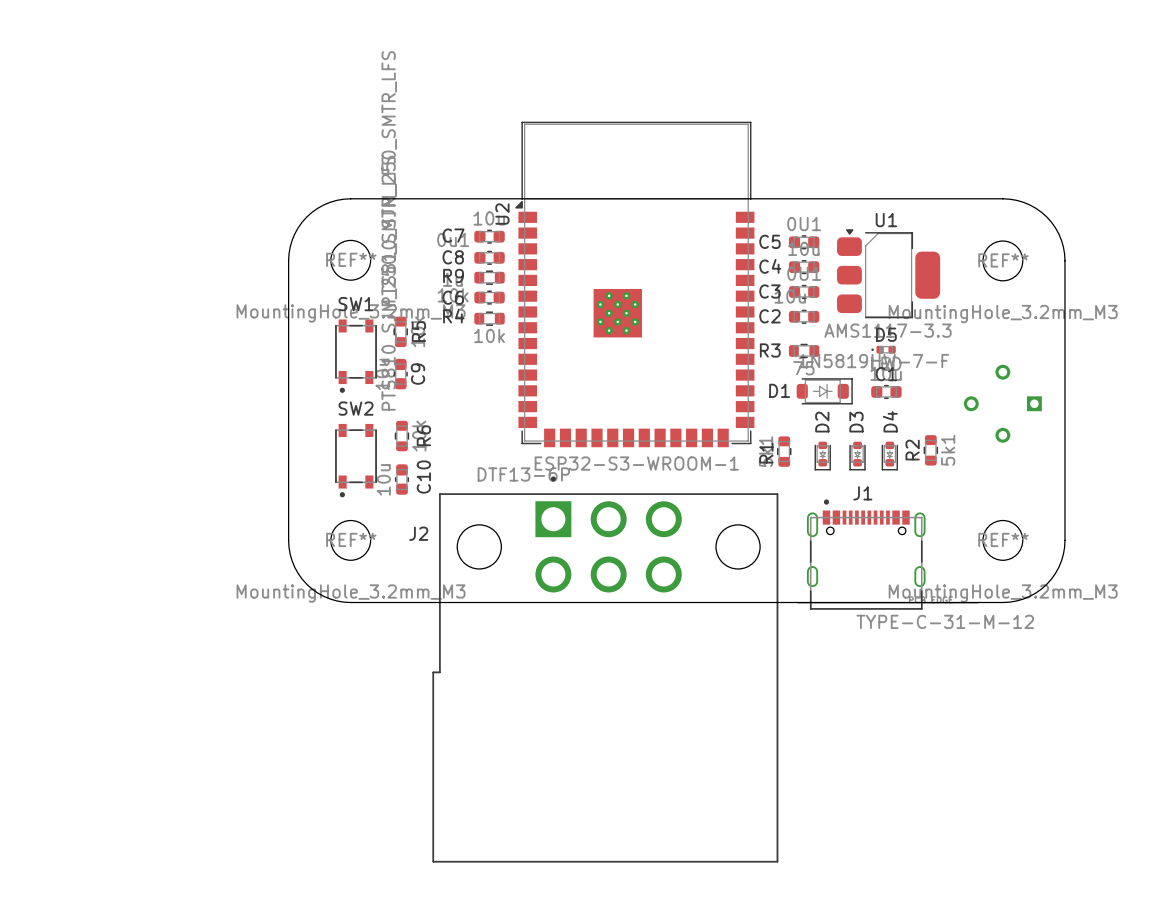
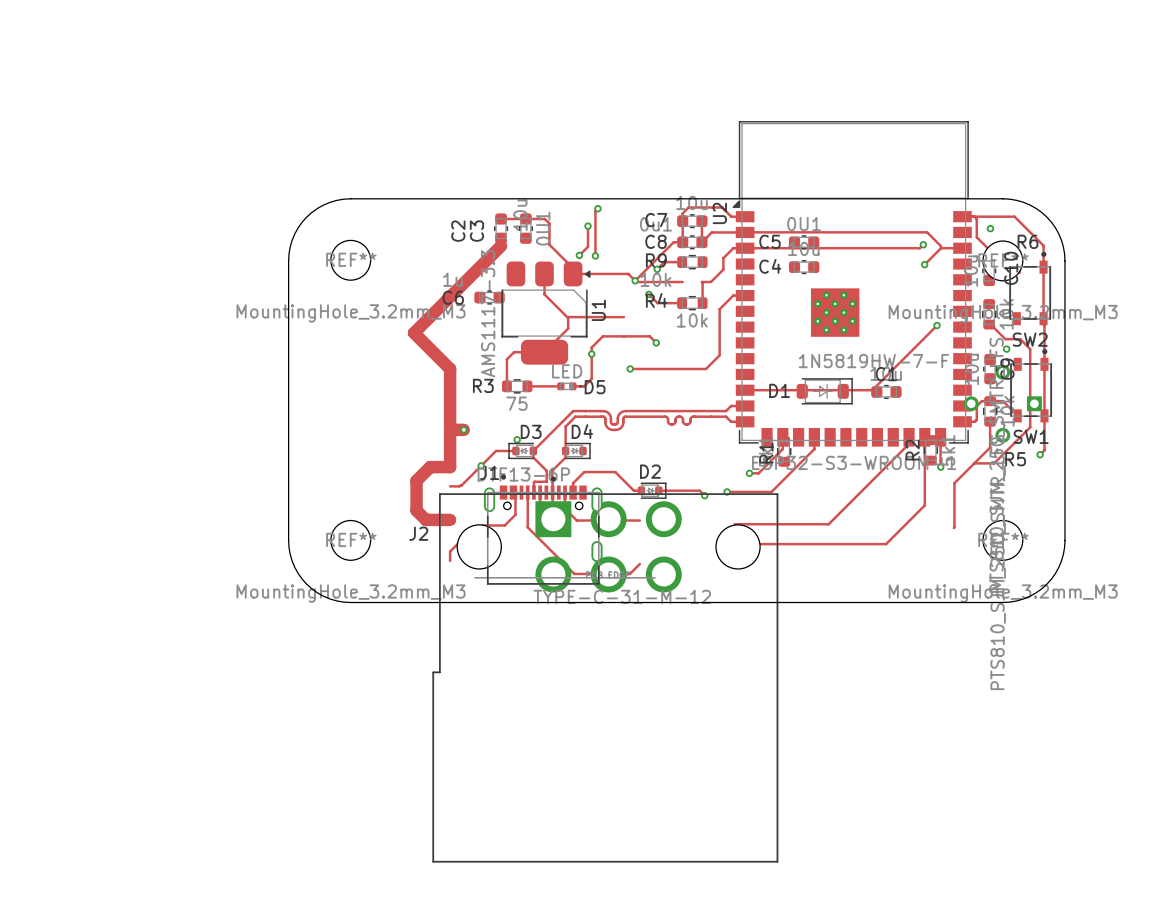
track: none -> (597, 208) (595, 211) (595, 255)
via: none -> (597, 208)
track: none -> (745, 216) (731, 216) (722, 207) (688, 207) (682, 213) (682, 242) (673, 242) (635, 280)
track: none -> (962, 216) (1014, 216) (1043, 245) (1044, 450) (1040, 454)
track: none -> (974, 216) (976, 219) (976, 237) (989, 249) (989, 261)
track: none -> (501, 218) (544, 218) (549, 223) (549, 244) (573, 268) (573, 273) (628, 273) (636, 282) (682, 282)
track: none -> (701, 221) (701, 242) (711, 232) (745, 232)
track: none -> (587, 226) (587, 246) (579, 255)
via: none -> (587, 226)
via: none -> (990, 228)
track: none -> (745, 232) (927, 232) (941, 248)
C7 position: (489, 236) -> (692, 221)
track: none -> (923, 244) (919, 248) (733, 248) (723, 258) (723, 269) (710, 282) (701, 282) (702, 303)
via: none -> (923, 244)
track: none -> (501, 246) (414, 332) (450, 368) (450, 467) (430, 467) (416, 480) (416, 510) (425, 519) (450, 519)
track: none -> (941, 248) (962, 248)
track: none -> (941, 248) (924, 264)
via: none -> (579, 255)
via: none -> (595, 255)
C8 position: (489, 257) -> (692, 242)
track: none -> (682, 262) (664, 262) (657, 269)
via: none -> (924, 264)
via: none -> (657, 269)
track: none -> (544, 273) (544, 294) (567, 317) (624, 317)
U1 rotation: 0° (888, 273) -> 90° clockwise (545, 313)
U1 position: (888, 273) -> (545, 313)
R9 position: (489, 277) -> (692, 262)
via: none -> (635, 280)
U2 position: (634, 284) -> (852, 283)
C3 rotation: 0° (804, 291) -> 90° clockwise (525, 228)
C3 position: (804, 291) -> (525, 228)
track: none -> (648, 294) (657, 303) (682, 303)
via: none -> (648, 294)
track: none -> (745, 295) (733, 295) (719, 309) (719, 355) (705, 368) (630, 368)
C2 rotation: 0° (804, 316) -> 90° clockwise (501, 228)
C2 position: (804, 316) -> (501, 228)
track: none -> (568, 317) (568, 328) (544, 352) (514, 352) (506, 359) (506, 386)
R4 position: (489, 318) -> (692, 303)
track: none -> (989, 324) (1005, 339) (1020, 339) (1030, 349) (1030, 427) (994, 463) (974, 463)
track: none -> (937, 325) (872, 390) (745, 390)
via: none -> (937, 325)
R5 position: (400, 331) -> (990, 411)
R5 name rotation: 0° (418, 331) -> 90° clockwise (1015, 459)
R5 name position: R5 (418, 331) -> R5 (1015, 459)
D5 name position: D5 (886, 334) -> D5 (595, 387)
track: none -> (656, 342) (649, 336) (602, 336) (591, 347) (591, 378) (584, 386) (572, 386)
via: none -> (656, 342)
D5 rotation: 0° (883, 349) -> 180° (569, 386)
D5 position: (883, 349) -> (569, 386)
via: none -> (1006, 349)
R3 position: (804, 350) -> (517, 386)
via: none -> (591, 354)
SW1 rotation: 0° (356, 356) -> 180° (1031, 385)
SW1 position: (356, 356) -> (1031, 385)
via: none -> (630, 368)
C9 position: (400, 374) -> (990, 369)
track: none -> (527, 386) (560, 386)
track: none -> (745, 406) (731, 406) (726, 411) (624, 411) (618, 414) (615, 424) (611, 423) (610, 415) (605, 411) (573, 411) (533, 450) (533, 457) (546, 470) (546, 481) (534, 481) (533, 492)
track: none -> (1017, 415) (1003, 401) (981, 401) (976, 406) (976, 419) (974, 421) (962, 421)
track: none -> (745, 421) (731, 421) (726, 416) (693, 416) (690, 418) (689, 423) (685, 424) (682, 417) (678, 416) (675, 418) (674, 423) (671, 424) (665, 416) (625, 416) (621, 427) (613, 429) (606, 426) (603, 416) (575, 416) (565, 426) (565, 457) (552, 470) (552, 502) (540, 503) (540, 492)
track: none -> (990, 421) (990, 447) (954, 483) (953, 527)
track: none -> (450, 429) (463, 429)
via: none -> (463, 429)
R6 name rotation: 0° (423, 435) -> 90° clockwise (1028, 241)
R6 name position: R6 (423, 435) -> R6 (1028, 241)
R6 position: (401, 436) -> (989, 314)
track: none -> (782, 437) (782, 449) (758, 473) (749, 473)
track: none -> (814, 437) (814, 449) (771, 491) (727, 491)
track: none -> (909, 437) (909, 443) (828, 524) (734, 524)
track: none -> (924, 437) (924, 505) (886, 544) (729, 544)
track: none -> (940, 437) (940, 467)
via: none -> (517, 439)
track: none -> (515, 450) (496, 450) (461, 485) (450, 486)
via: none -> (1040, 454)
D2 rotation: 0° (822, 456) -> 90° counterclockwise (652, 490)
D2 position: (822, 456) -> (652, 490)
D3 rotation: 0° (857, 456) -> 90° clockwise (522, 450)
D3 position: (857, 456) -> (522, 450)
D4 rotation: 0° (889, 456) -> 90° counterclockwise (576, 450)
D4 position: (889, 456) -> (576, 450)
SW2 rotation: 0° (356, 460) -> 180° (1030, 288)
SW2 position: (356, 460) -> (1030, 288)
via: none -> (481, 465)
via: none -> (940, 467)
via: none -> (749, 473)
C10 position: (401, 479) -> (989, 270)
track: none -> (641, 490) (633, 490) (615, 472) (584, 472) (573, 483) (573, 492)
track: none -> (658, 490) (699, 490) (704, 495)
via: none -> (727, 491)
track: none -> (513, 492) (515, 494) (515, 514) (504, 525) (482, 525) (474, 532) (468, 532) (450, 551) (450, 560)
track: none -> (527, 492) (527, 527) (574, 573) (629, 573) (639, 564)
track: none -> (565, 492) (565, 508) (576, 520) (639, 520)
J1 name position: J1 (862, 493) -> J1 (489, 472)
via: none -> (704, 495)
J1 position: (887, 554) -> (565, 529)

